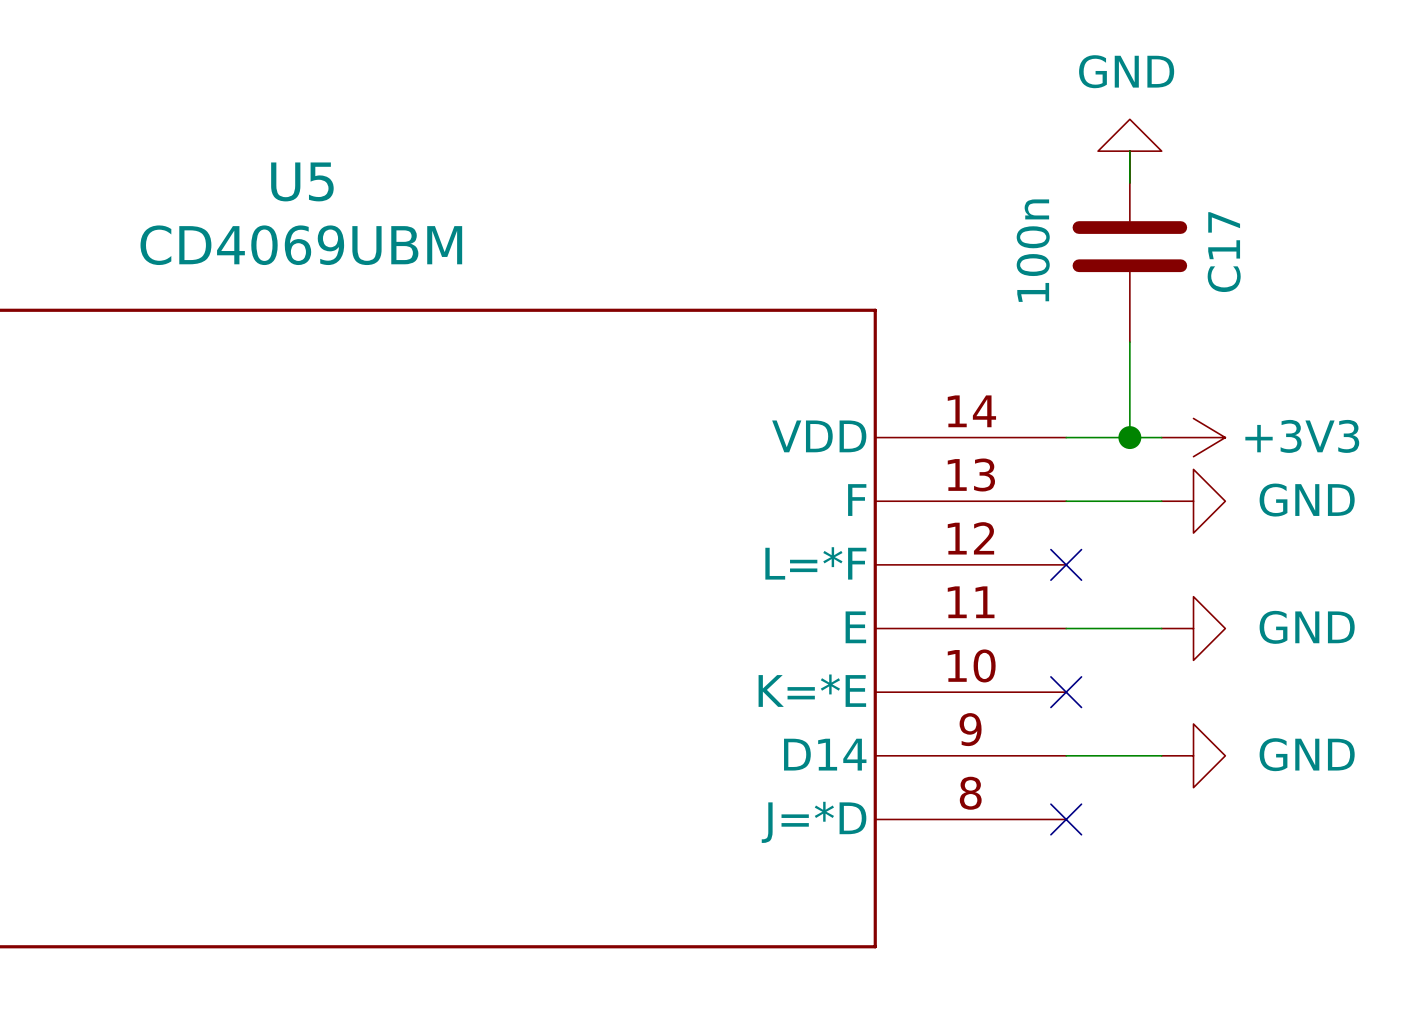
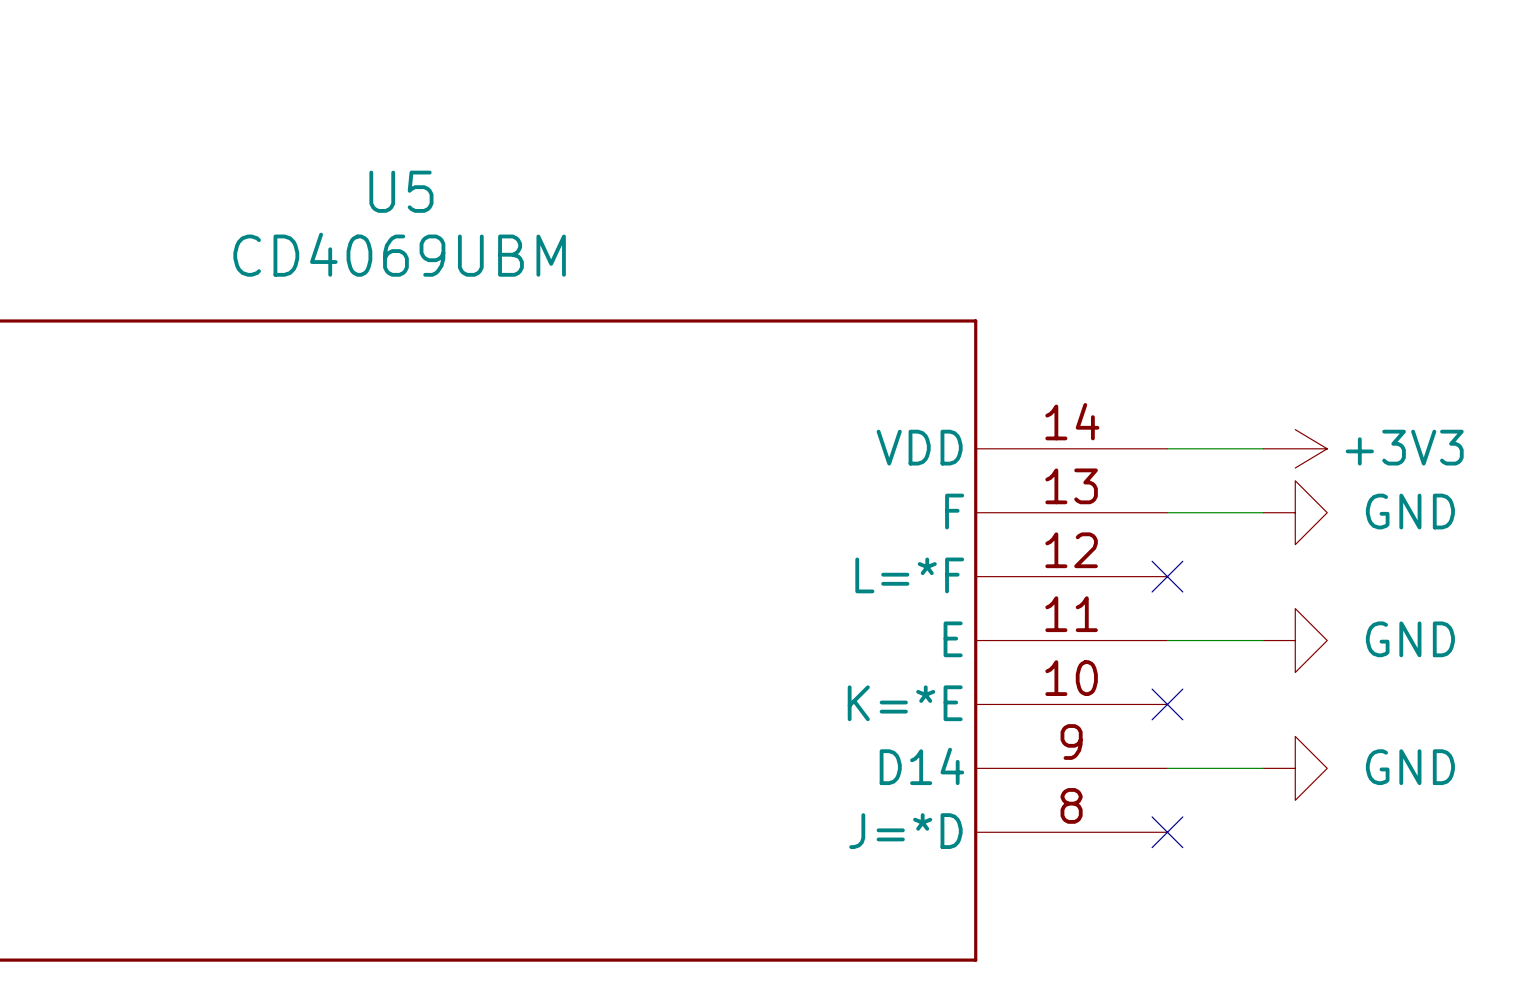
wire: (1129, 151) (1129, 182) -> none
power symbol: GND (1129, 151) -> none
C17: 100n (1129, 246) -> none
wire: (1129, 342) (1129, 437) -> none
junction: (1129, 437) -> none

